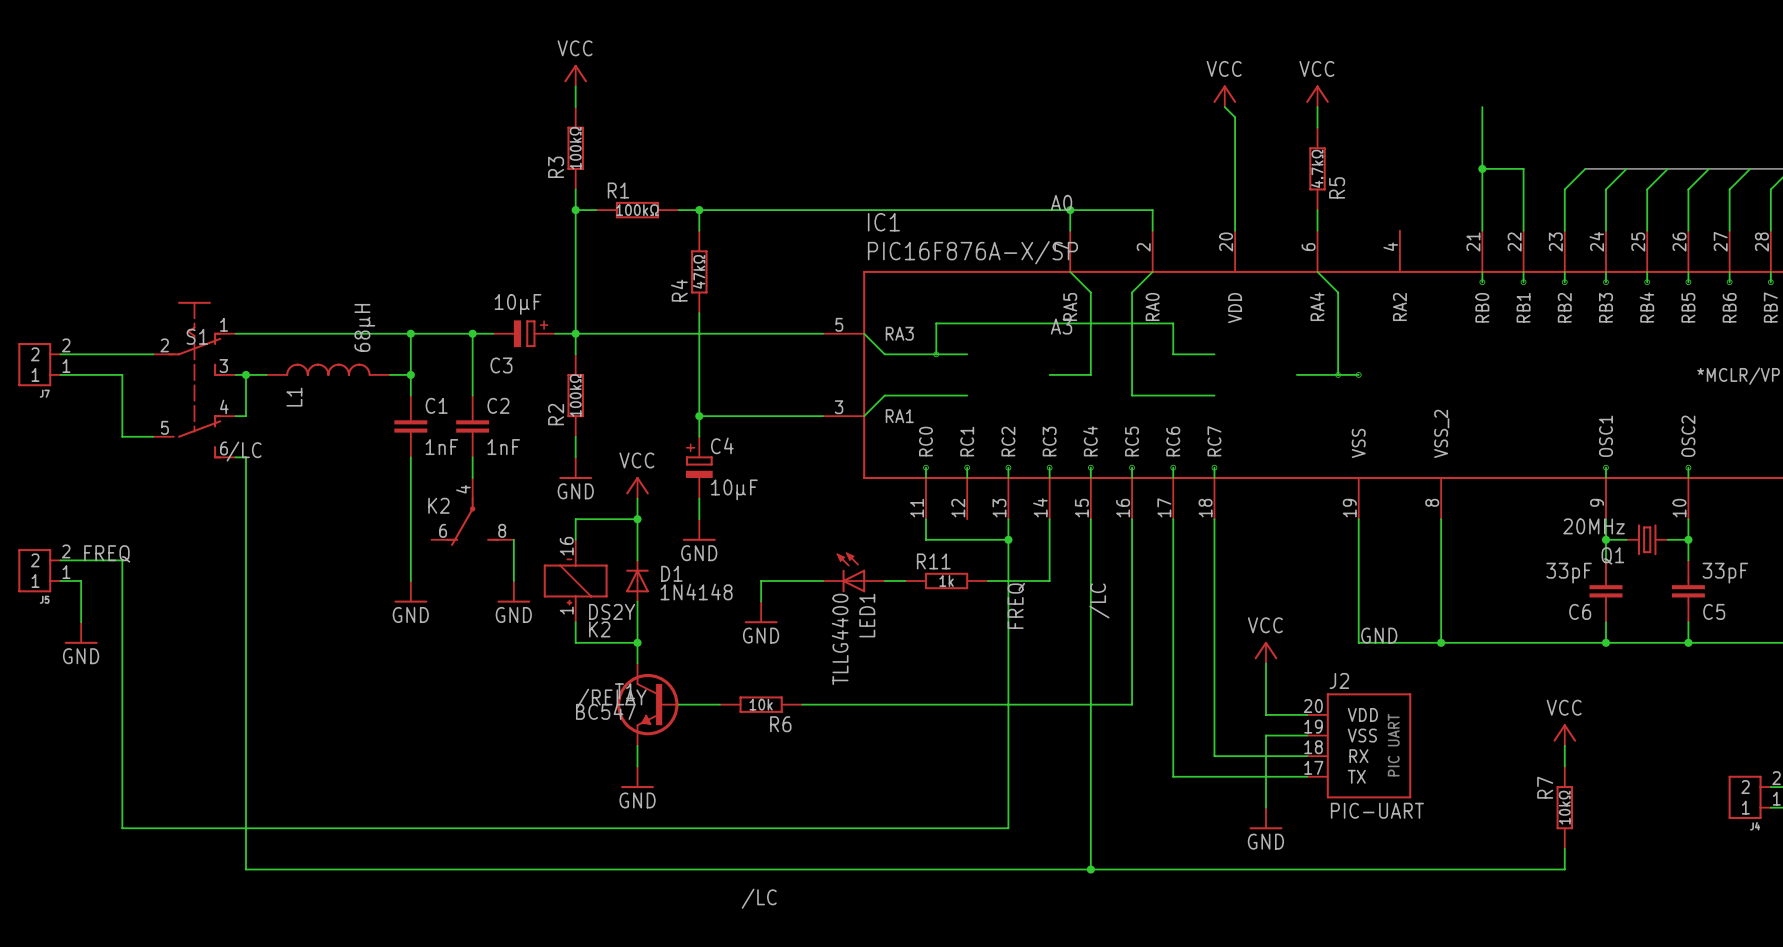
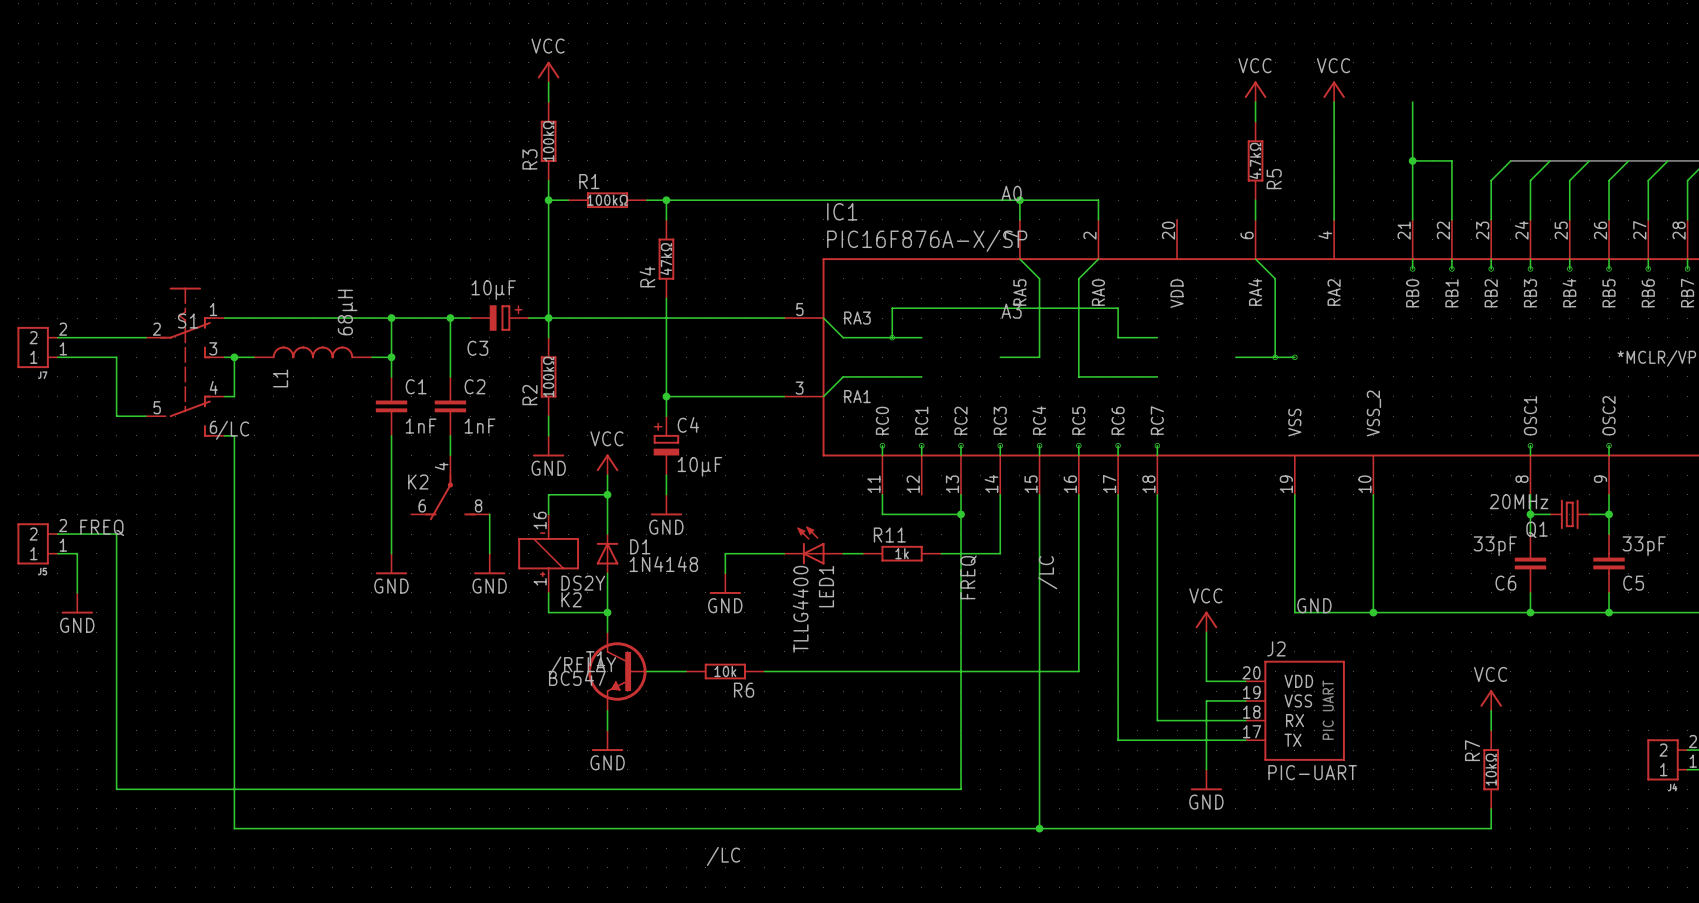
power symbol position: VCC (1224, 96) -> VCC (1334, 91)
wire: (1224, 107) (1235, 117) (1235, 230) -> none
wire: none -> (1334, 102) (1334, 219)
IC1 pin number: 8 (1432, 502) -> 10 (1364, 484)
IC1 pin number: 9 (1597, 502) -> 8 (1521, 479)
IC1 pin number: 10 (1679, 508) -> 9 (1600, 479)

